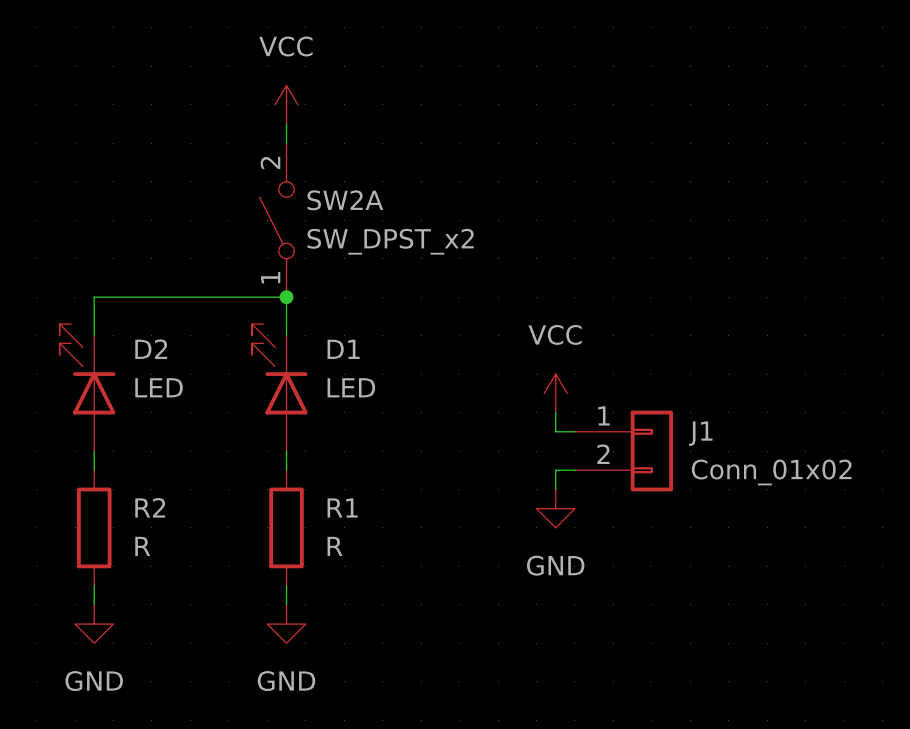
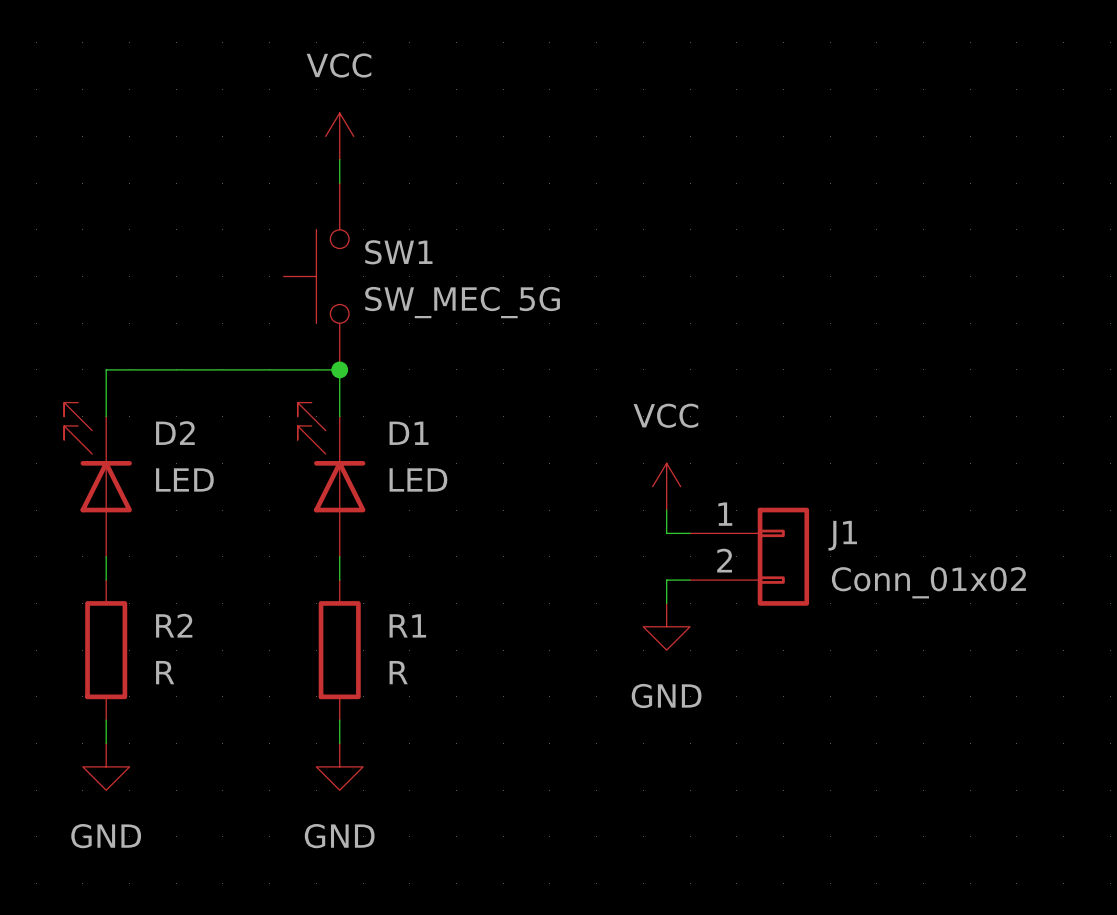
SW1: none -> SW_MEC_5G (316, 276)
SW2A: SW_DPST_x2 (276, 220) -> none

